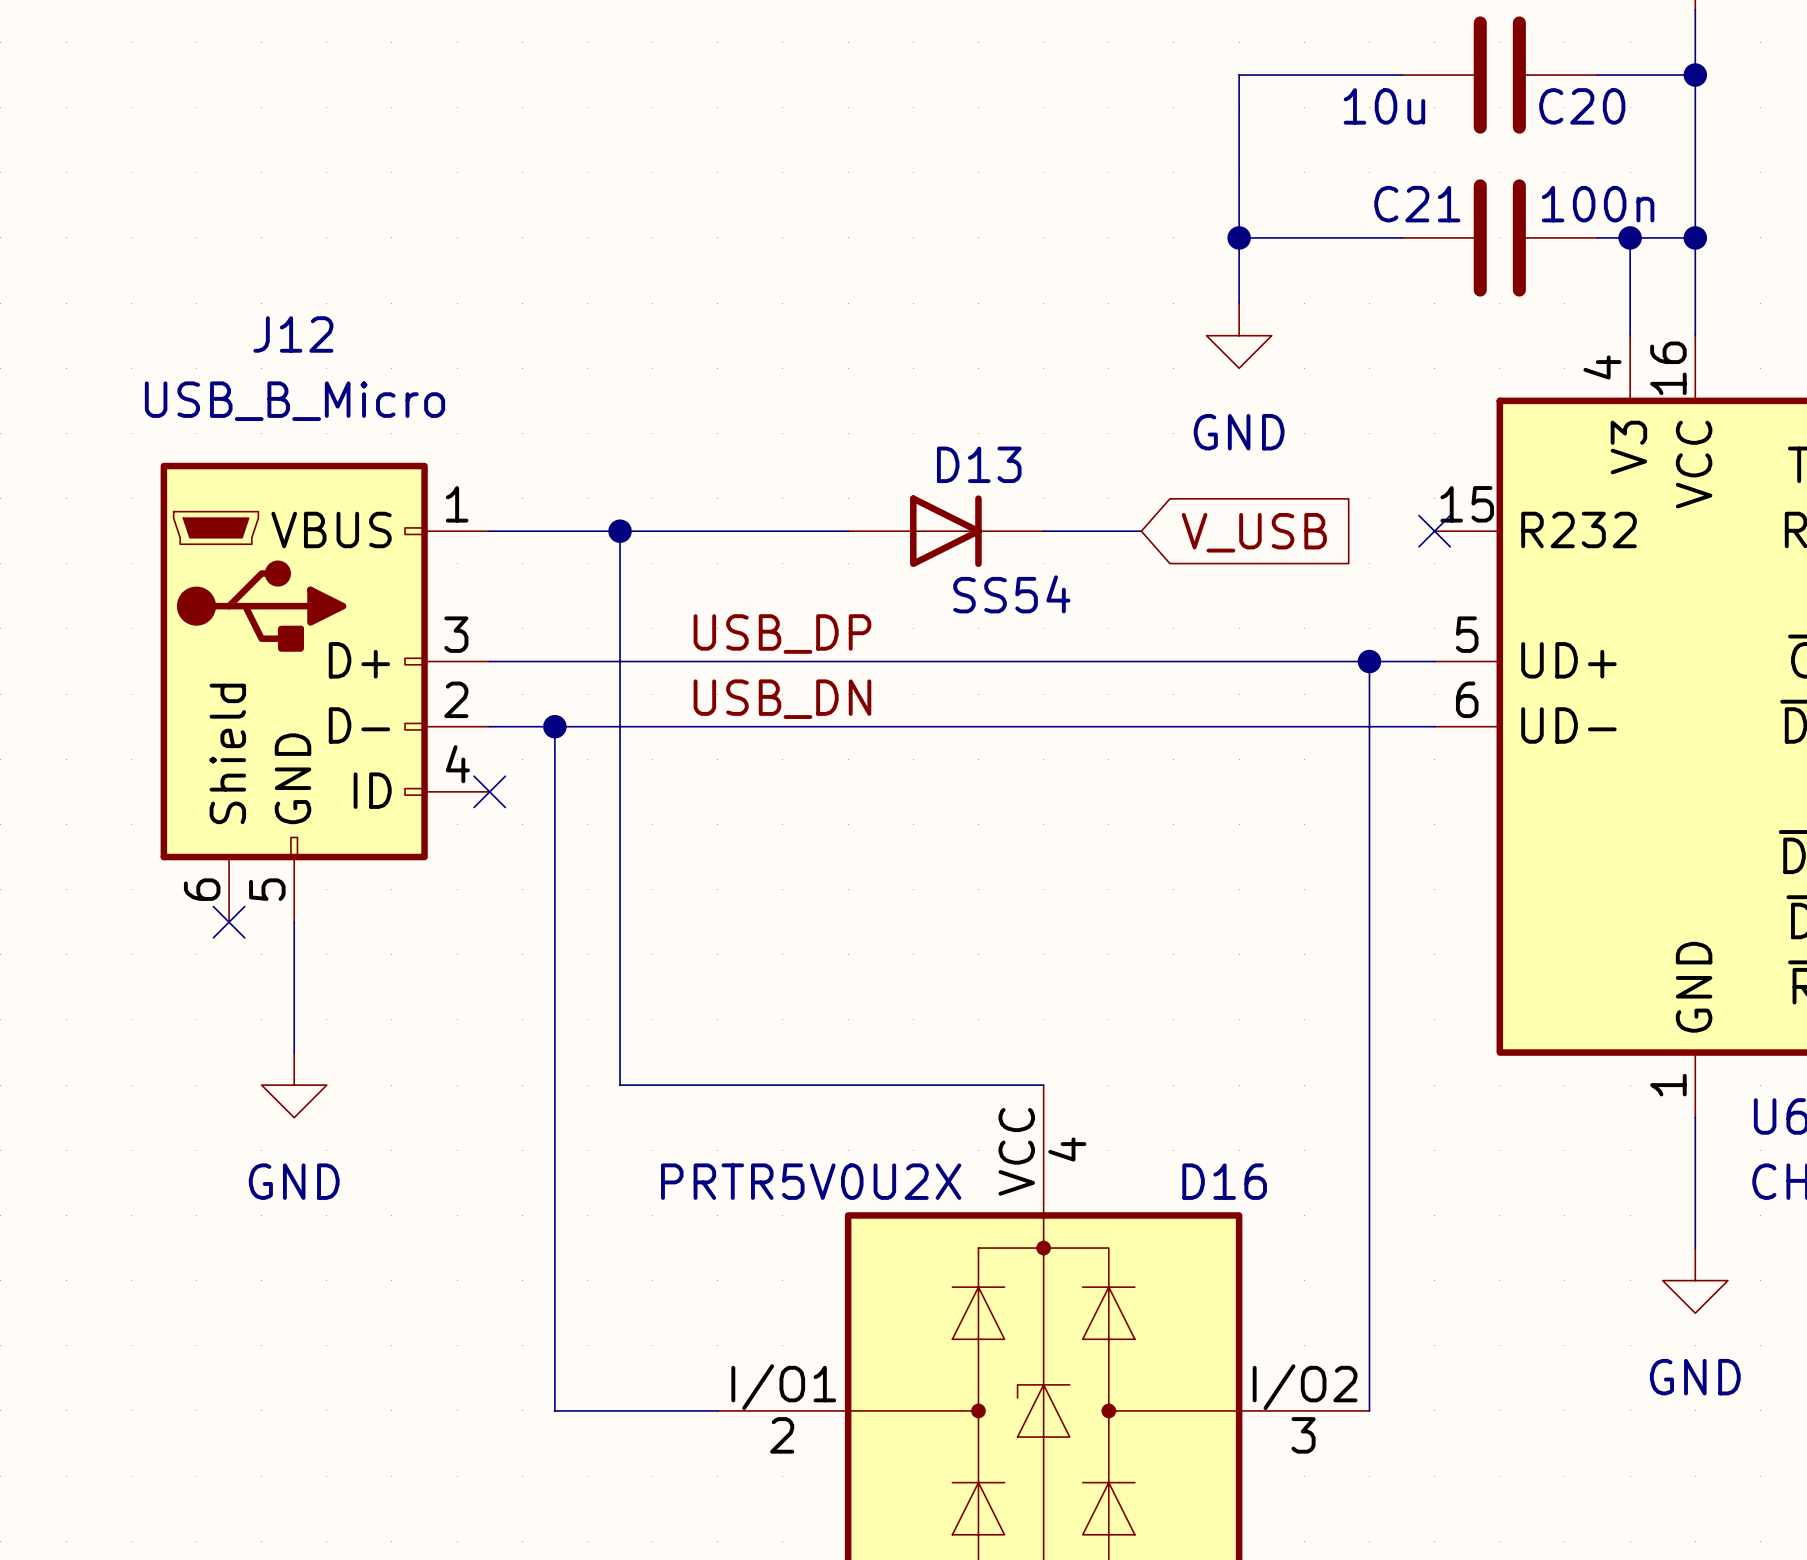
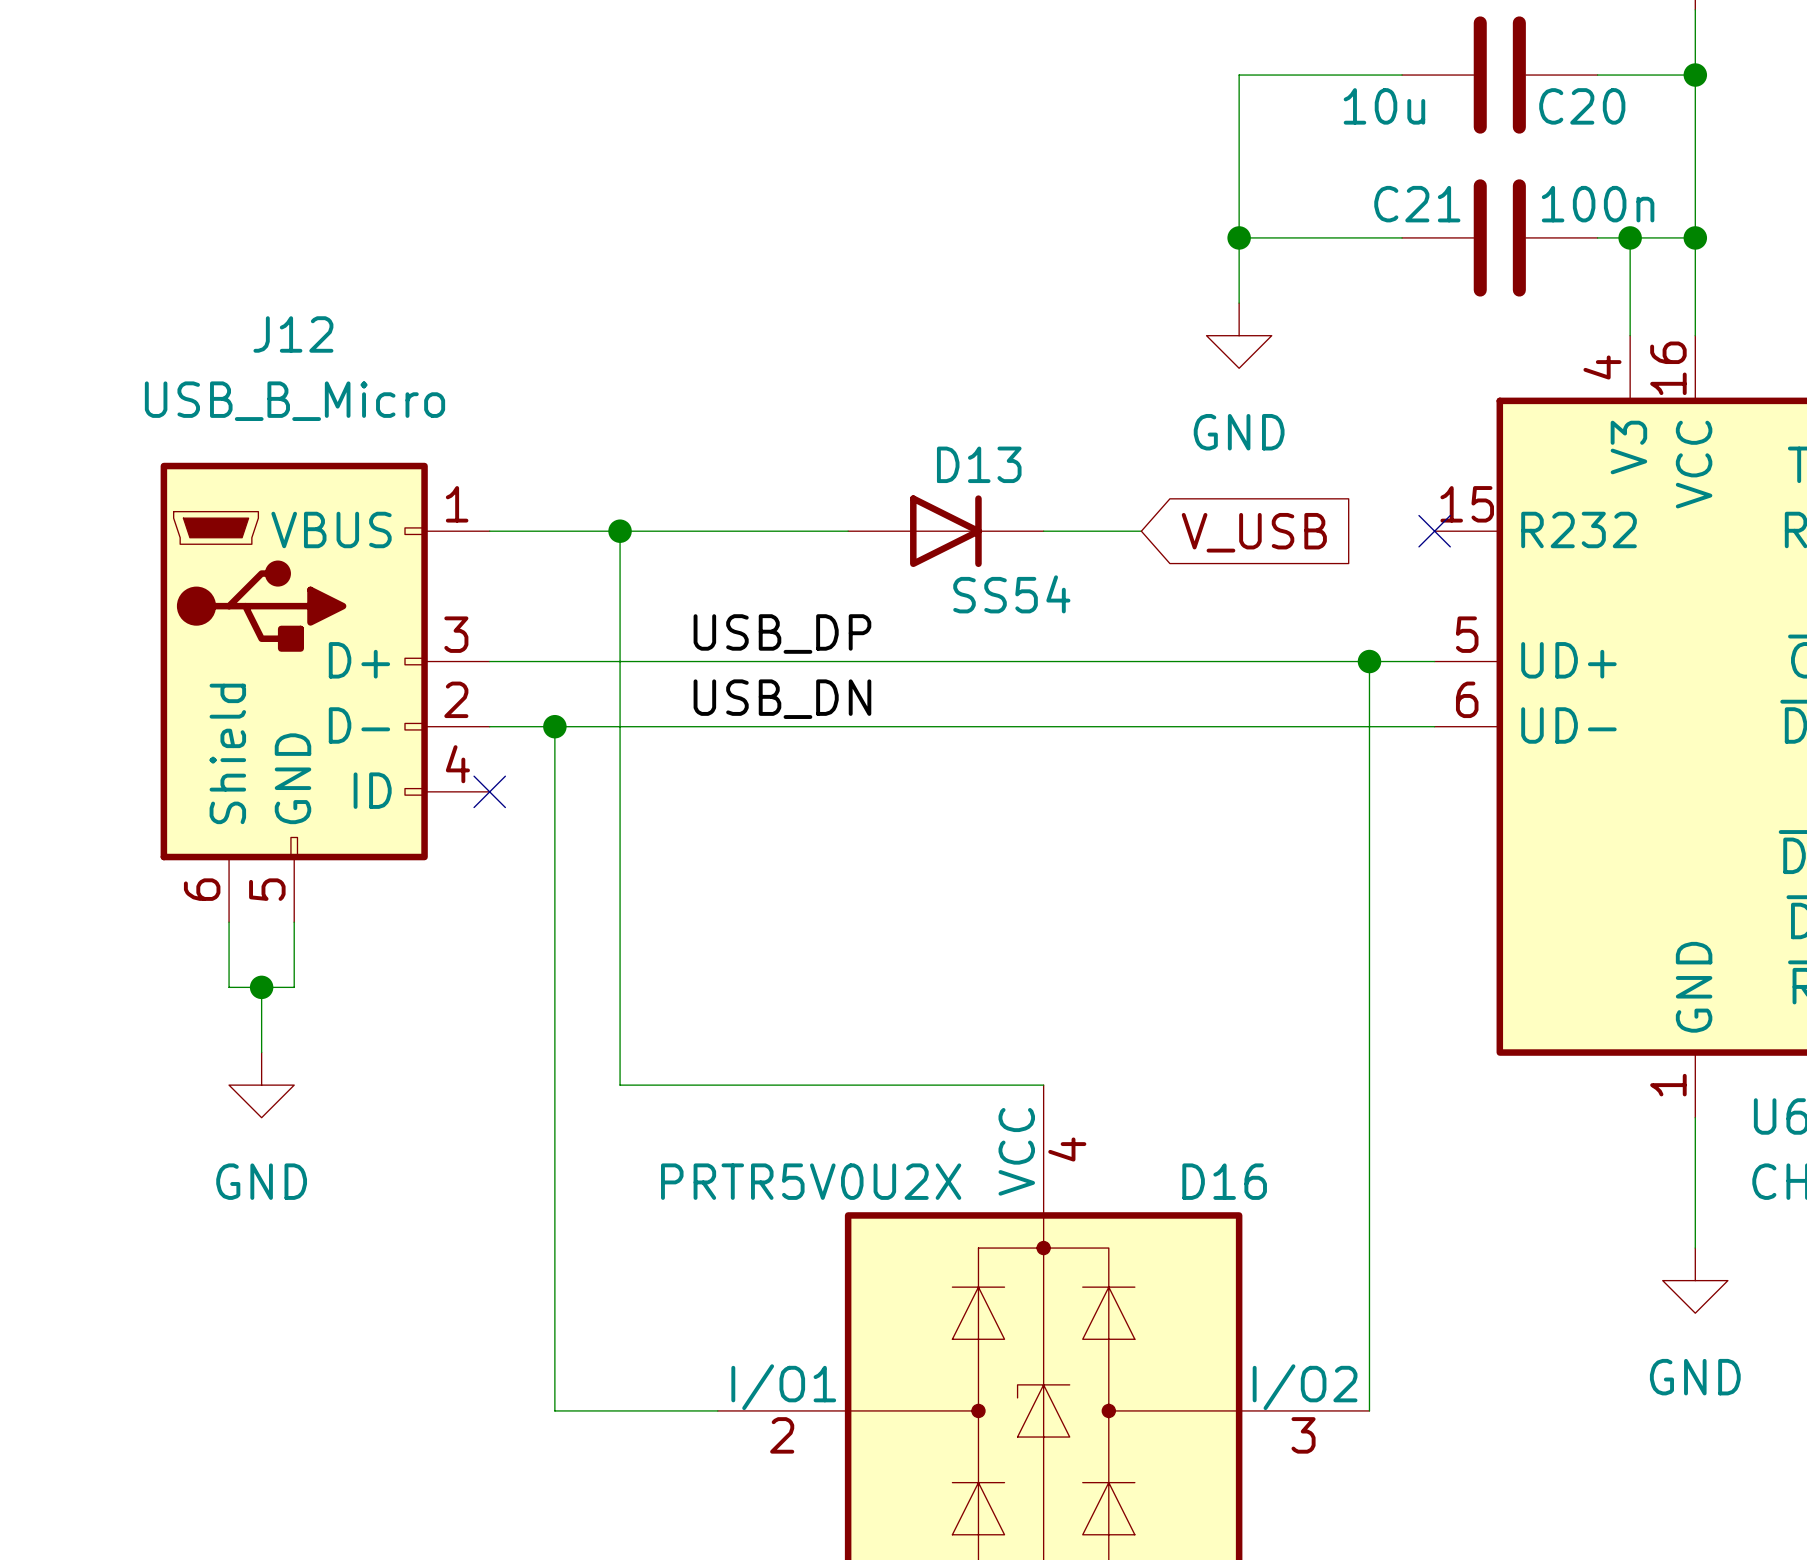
no-connect mark: (229, 922) -> none
wire: none -> (261, 987) (261, 1052)
junction: none -> (261, 987)
wire: (294, 987) (294, 1052) -> (294, 987) (229, 987) (229, 922)
power symbol position: GND (294, 1085) -> GND (261, 1085)

